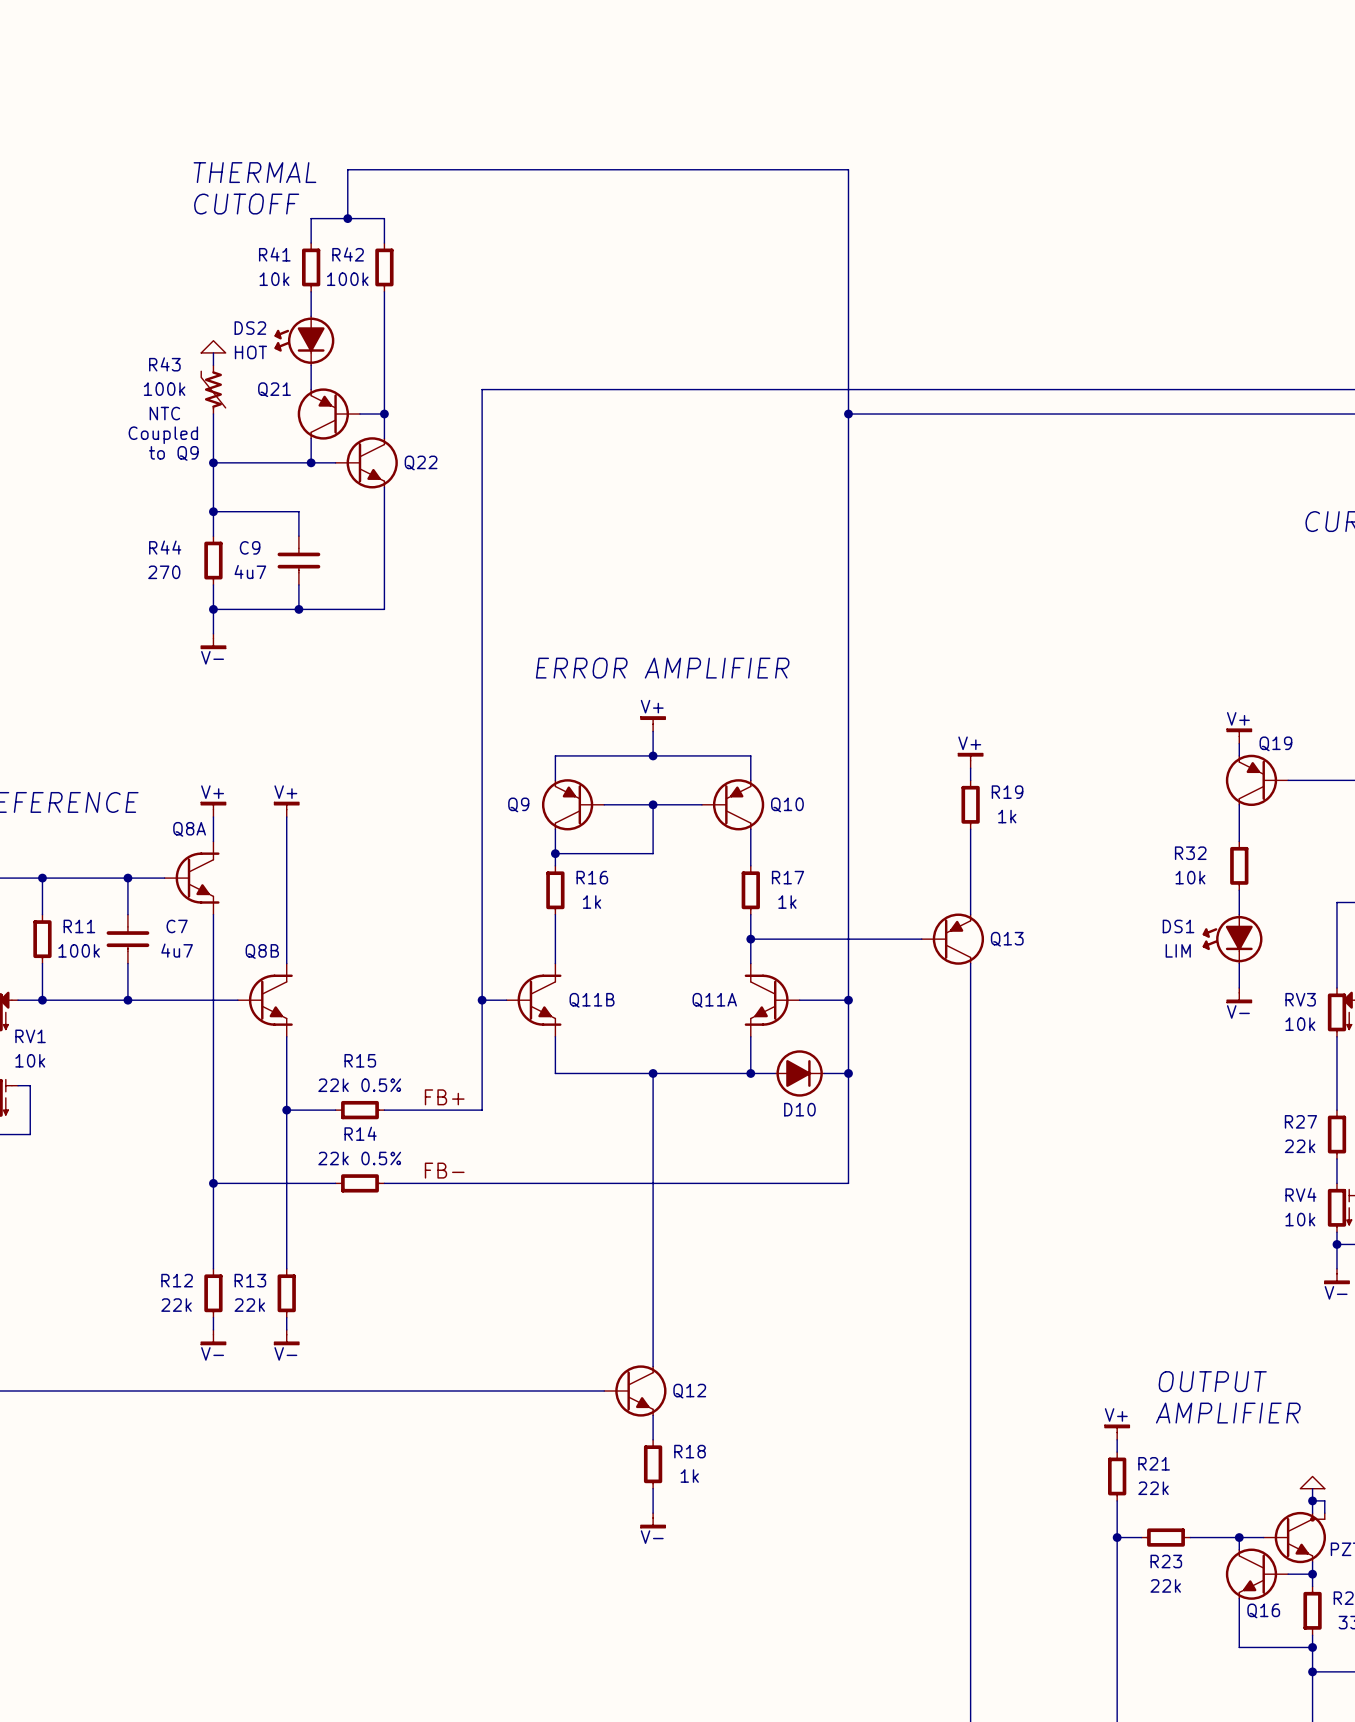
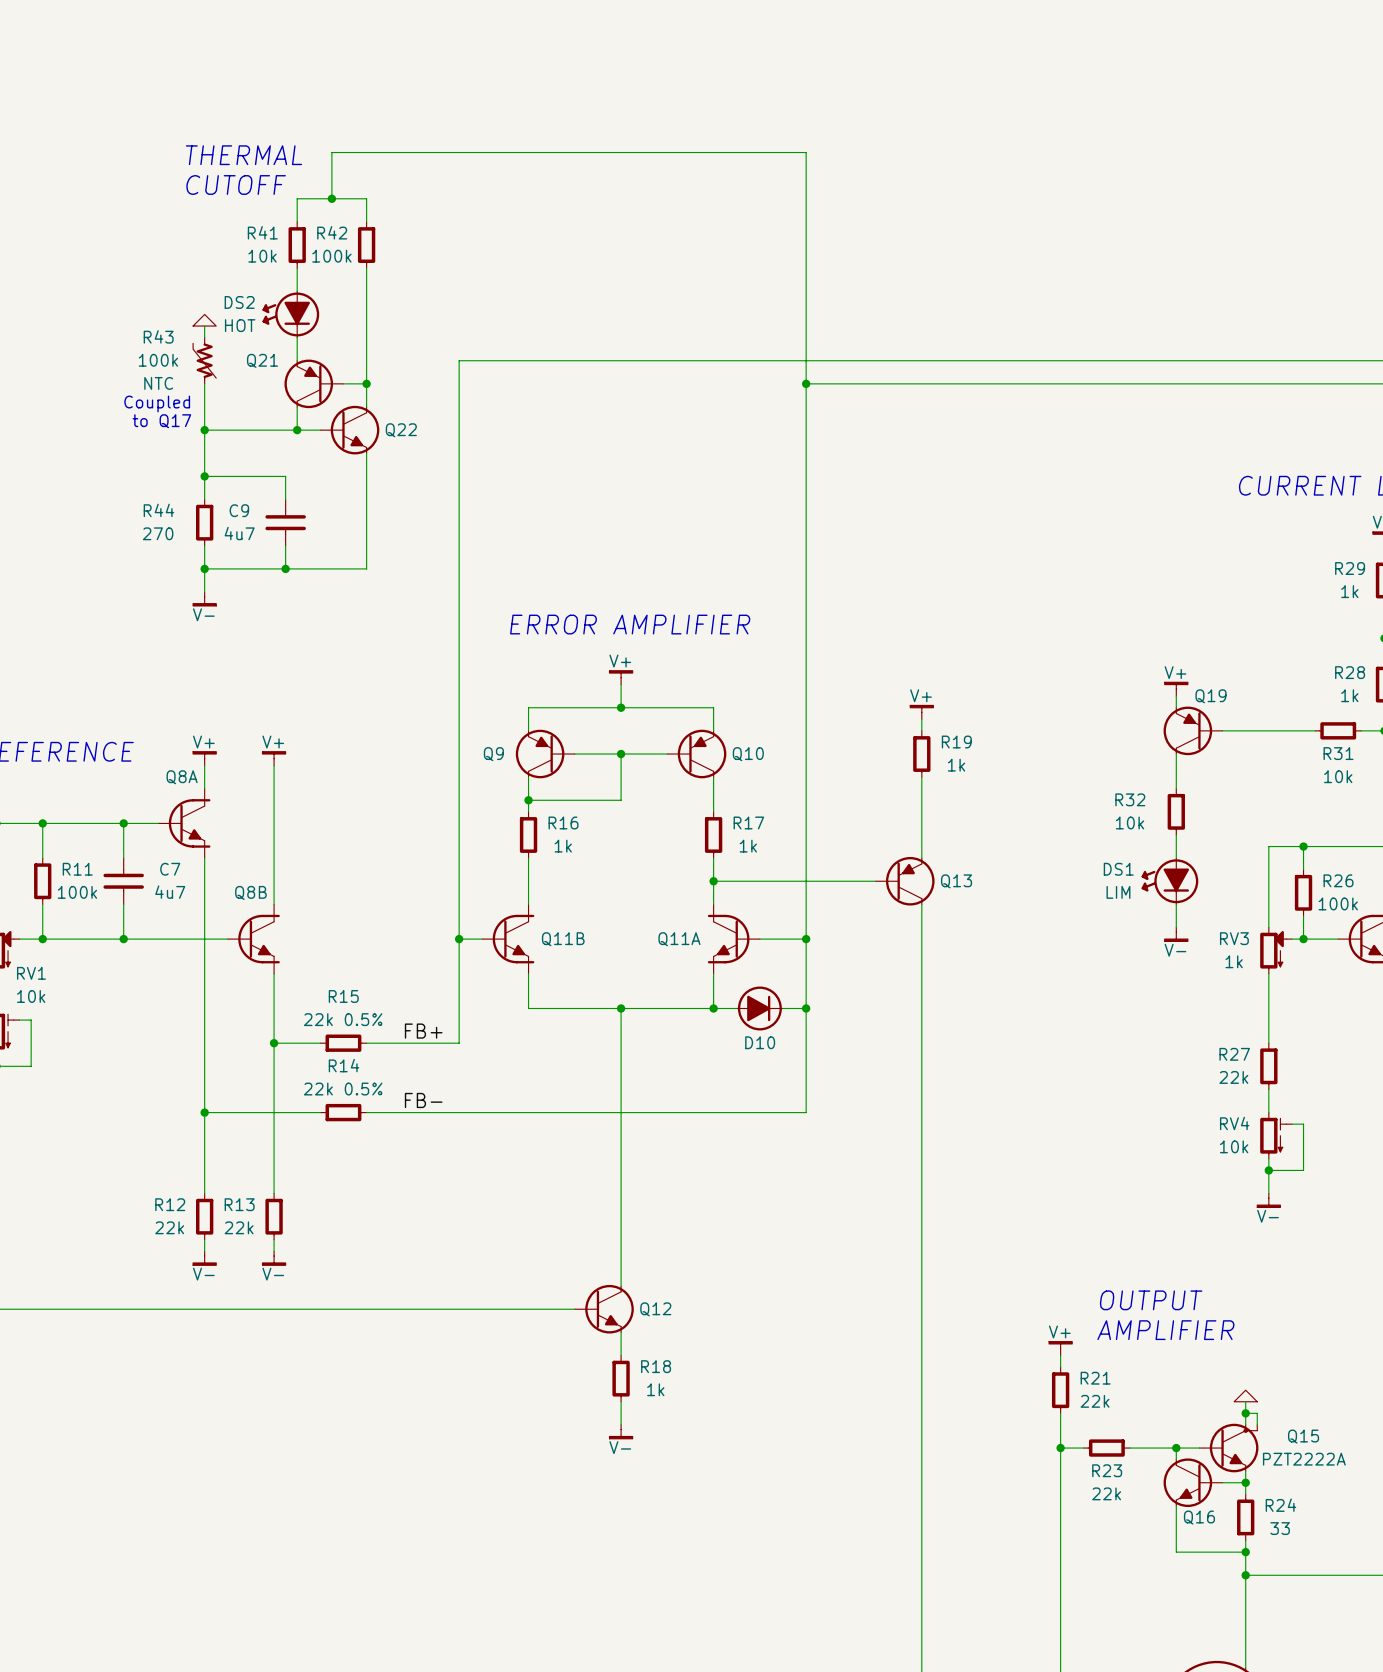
text: to Q9 (173, 453) -> to Q17 (161, 421)
RV3 value: 10k (1300, 1024) -> 1k (1234, 961)

